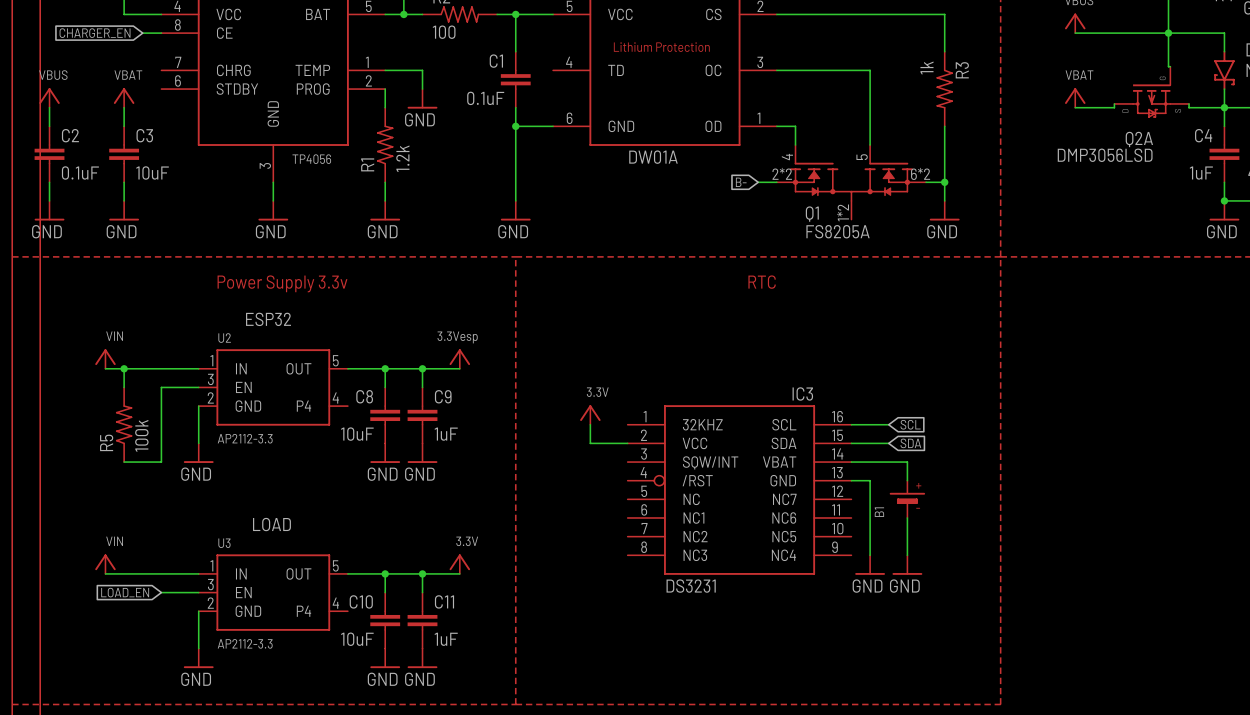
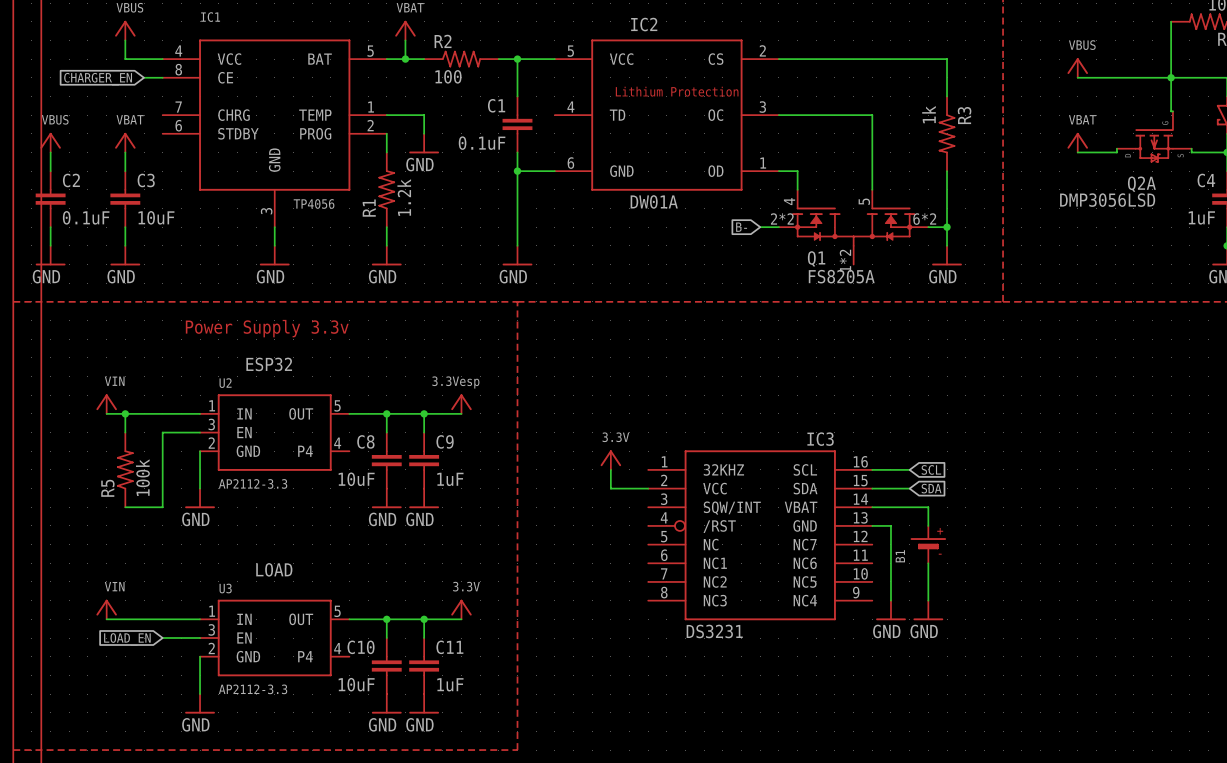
line: (1000, 256) (1000, 704) (515, 704) -> none
text: RTC (762, 282) -> none
power symbol position: 3.3V (590, 414) -> 3.3V (610, 460)
wire: (590, 424) (590, 443) (609, 443) -> (610, 469) (610, 488)
global label position: SCL (910, 424) -> SCL (931, 469)
global label position: SDA (910, 443) -> SDA (931, 488)
wire: (907, 462) (907, 480) -> (909, 507) (928, 507) (928, 525)
wire: (851, 480) (870, 480) (870, 555) -> (872, 525) (890, 525) (890, 600)
IC3 position: (739, 490) -> (760, 535)
B1 position: (907, 499) -> (928, 544)
wire: (907, 517) (907, 555) -> (928, 563) (928, 600)
power symbol: GND (870, 565) -> none
power symbol: none -> GND (890, 610)
power symbol: GND (907, 565) -> none
power symbol: none -> GND (928, 610)

